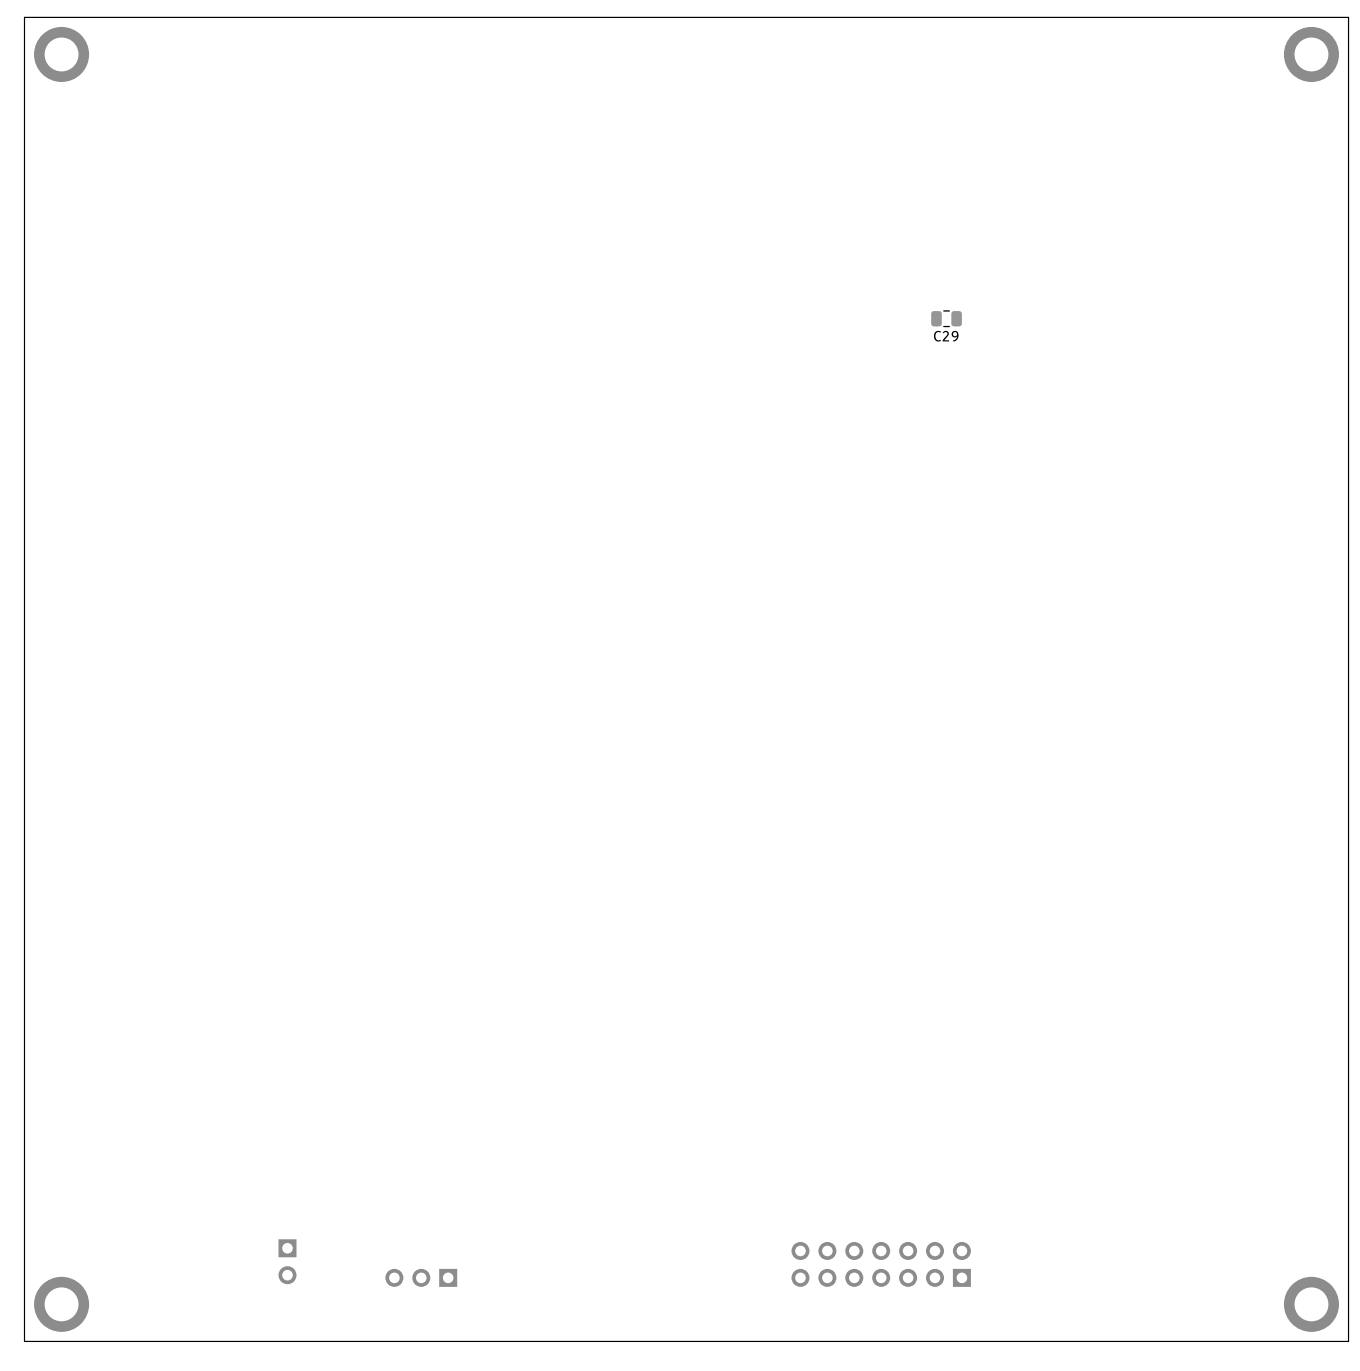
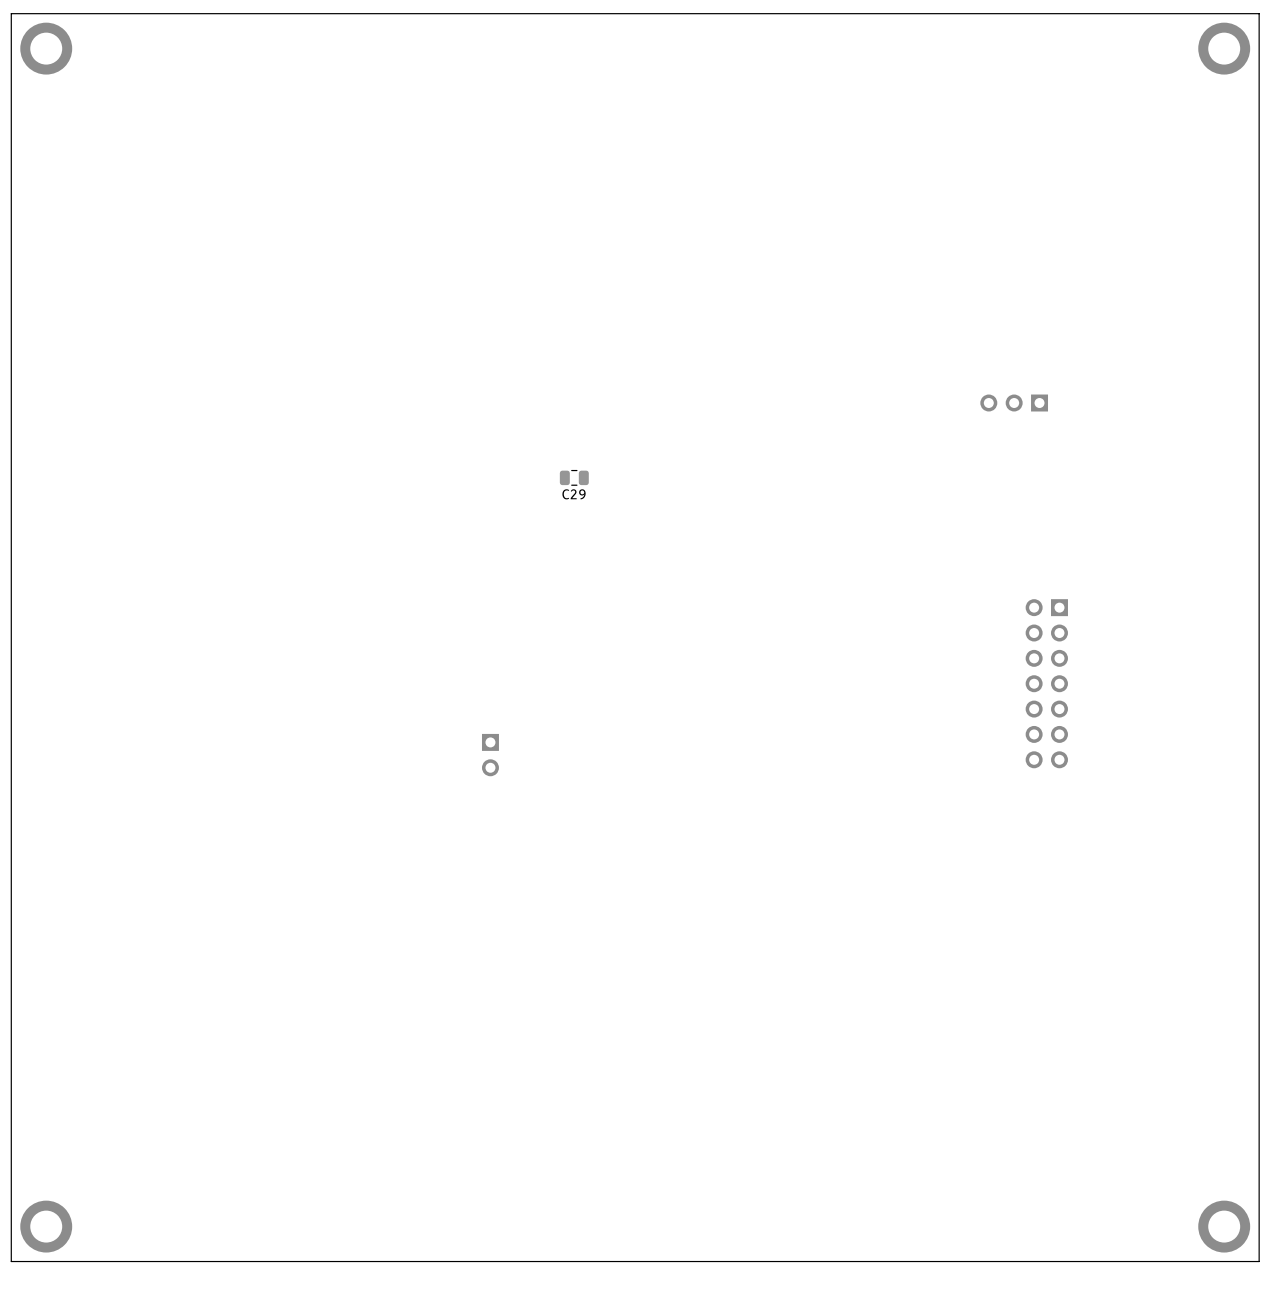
C29 position: (946, 318) -> (574, 477)
part: none -> (1014, 403)
part: none -> (1046, 683)
part: none -> (490, 755)
part: (287, 1261) -> none
part: (881, 1264) -> none
part: (421, 1277) -> none

